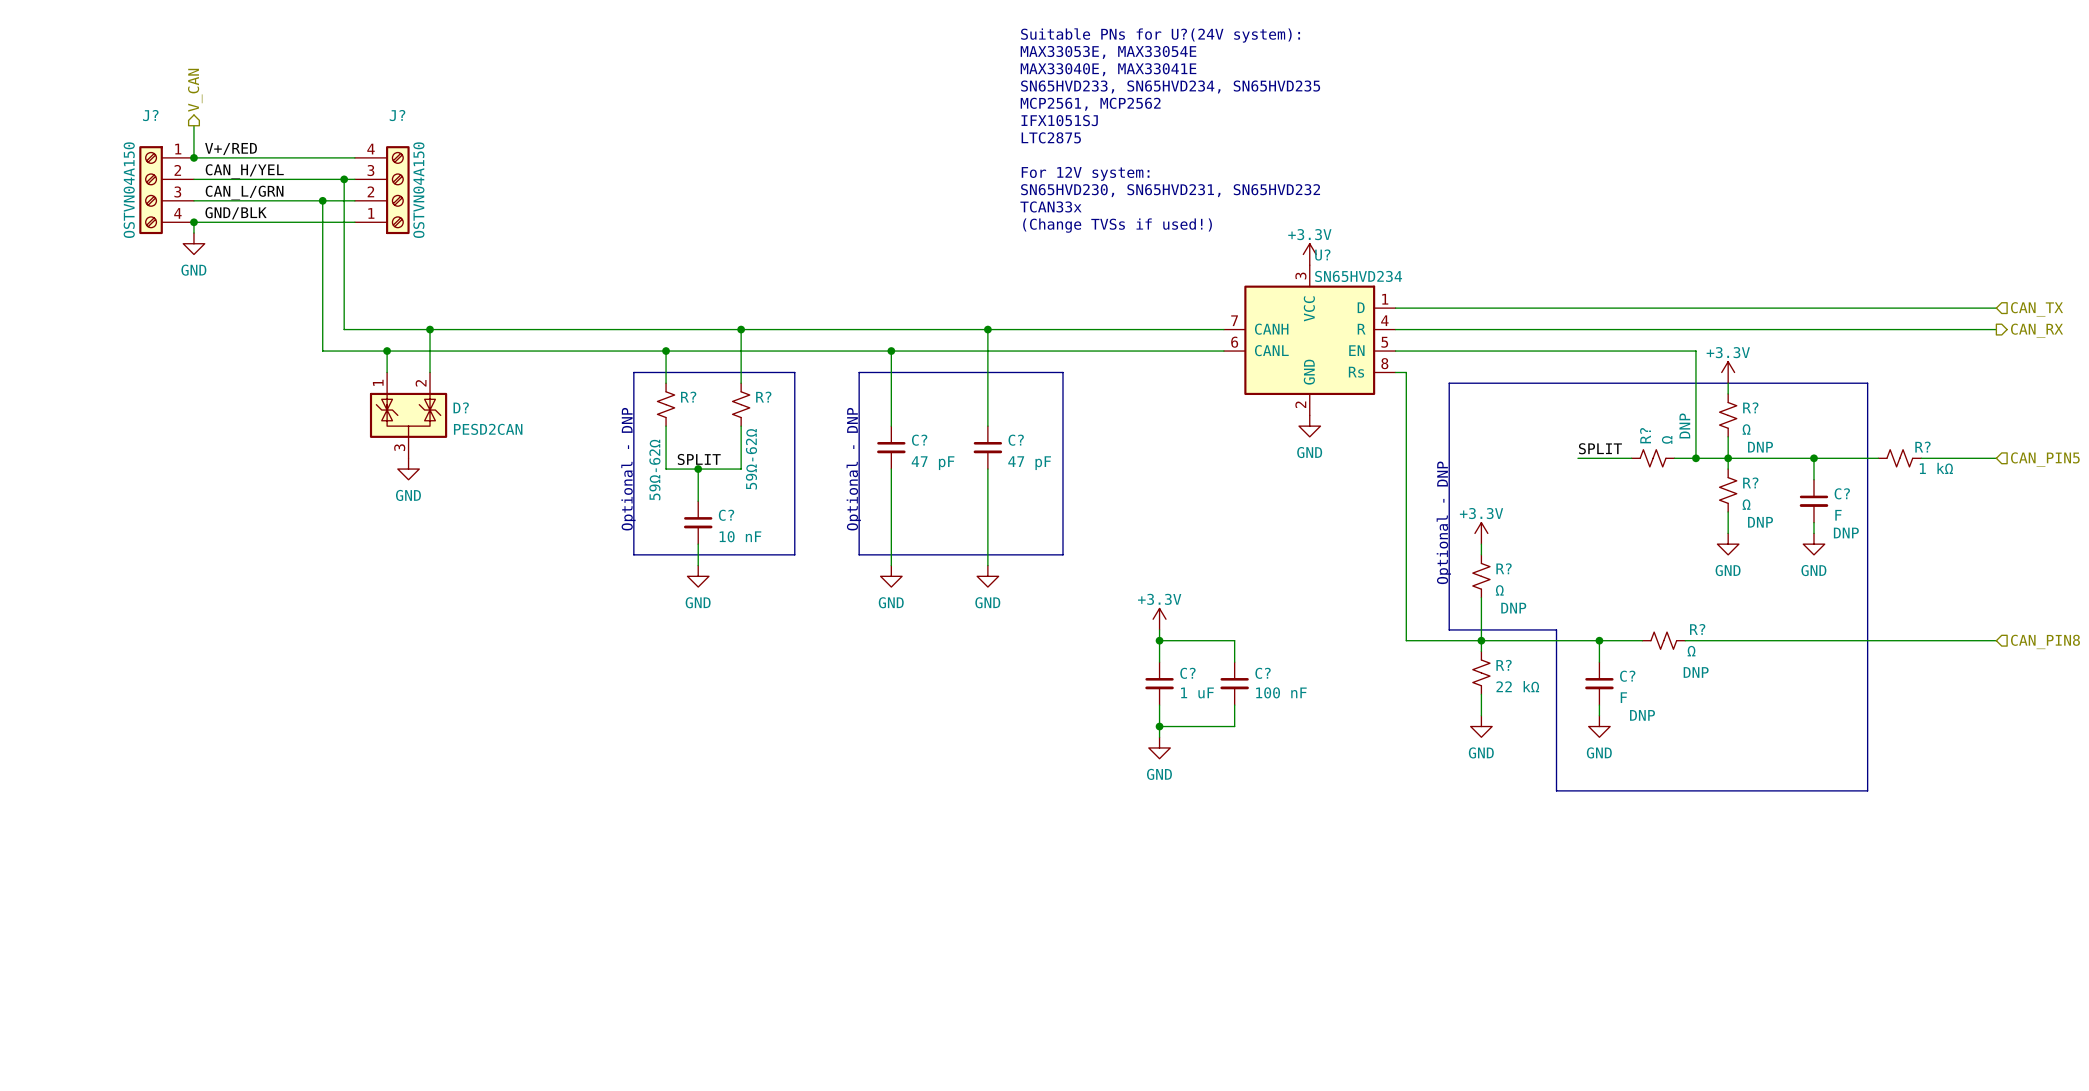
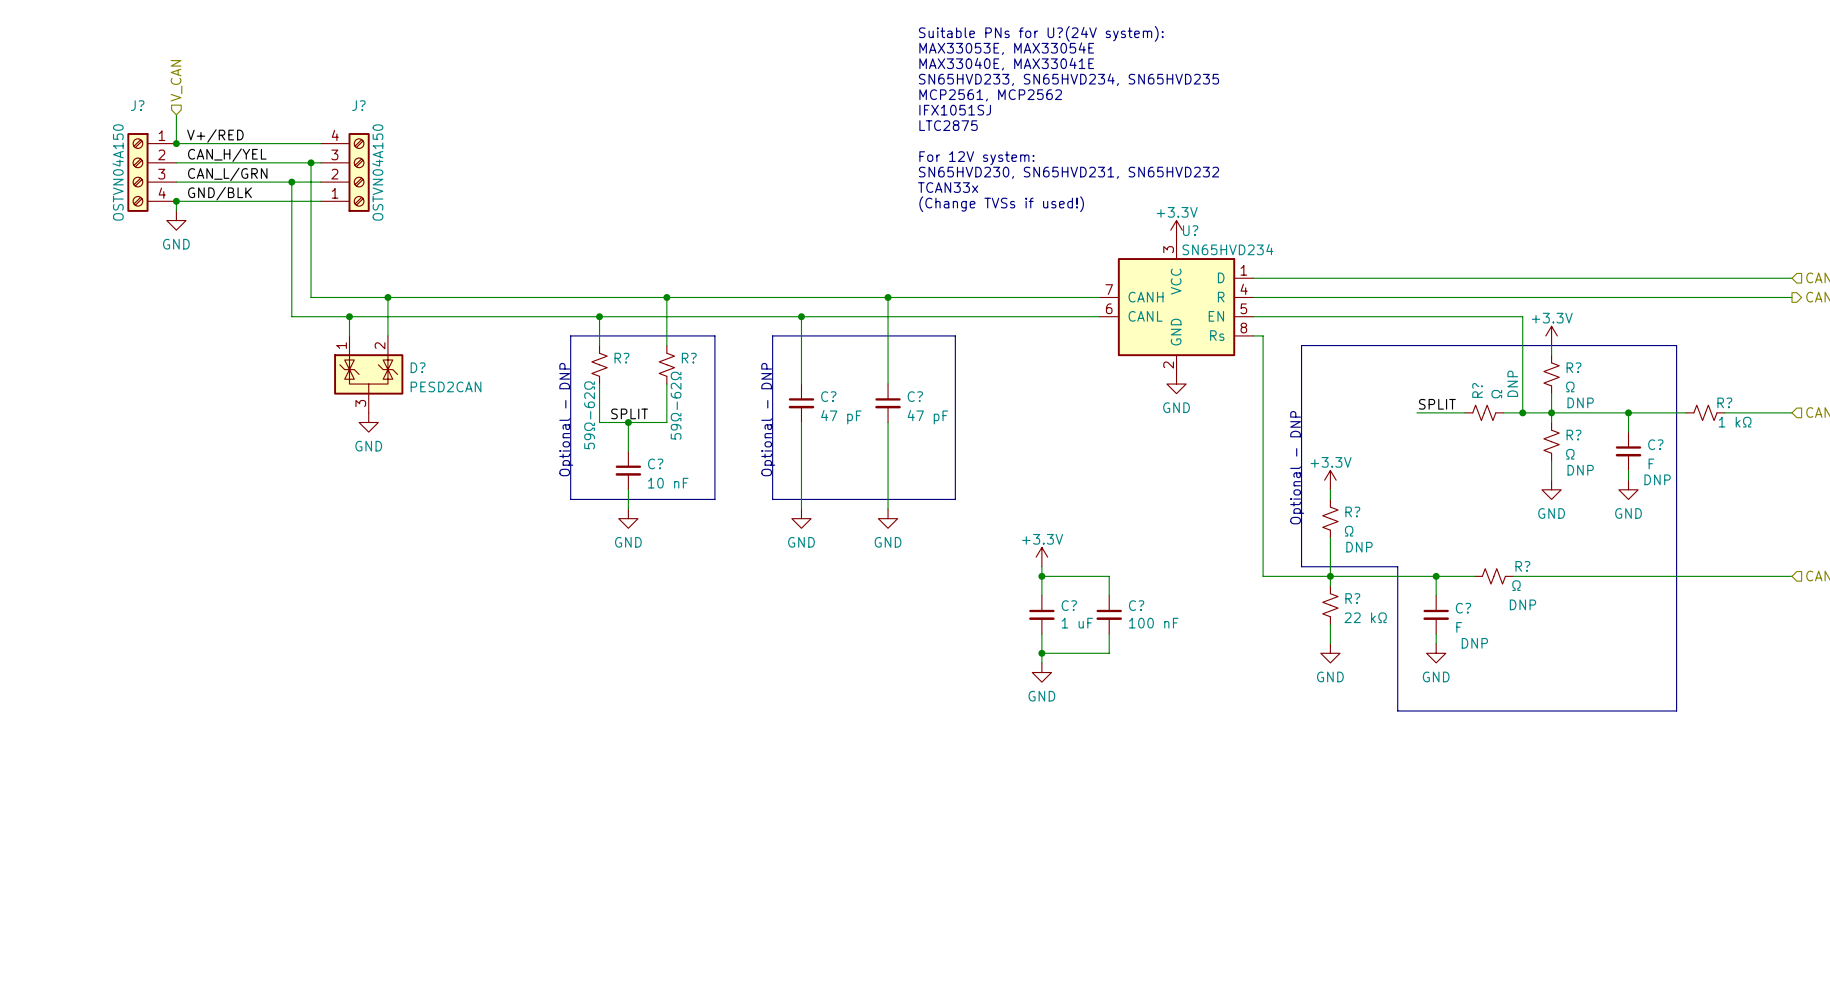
hierarchical label shape: output (195, 90) -> input (176, 80)

